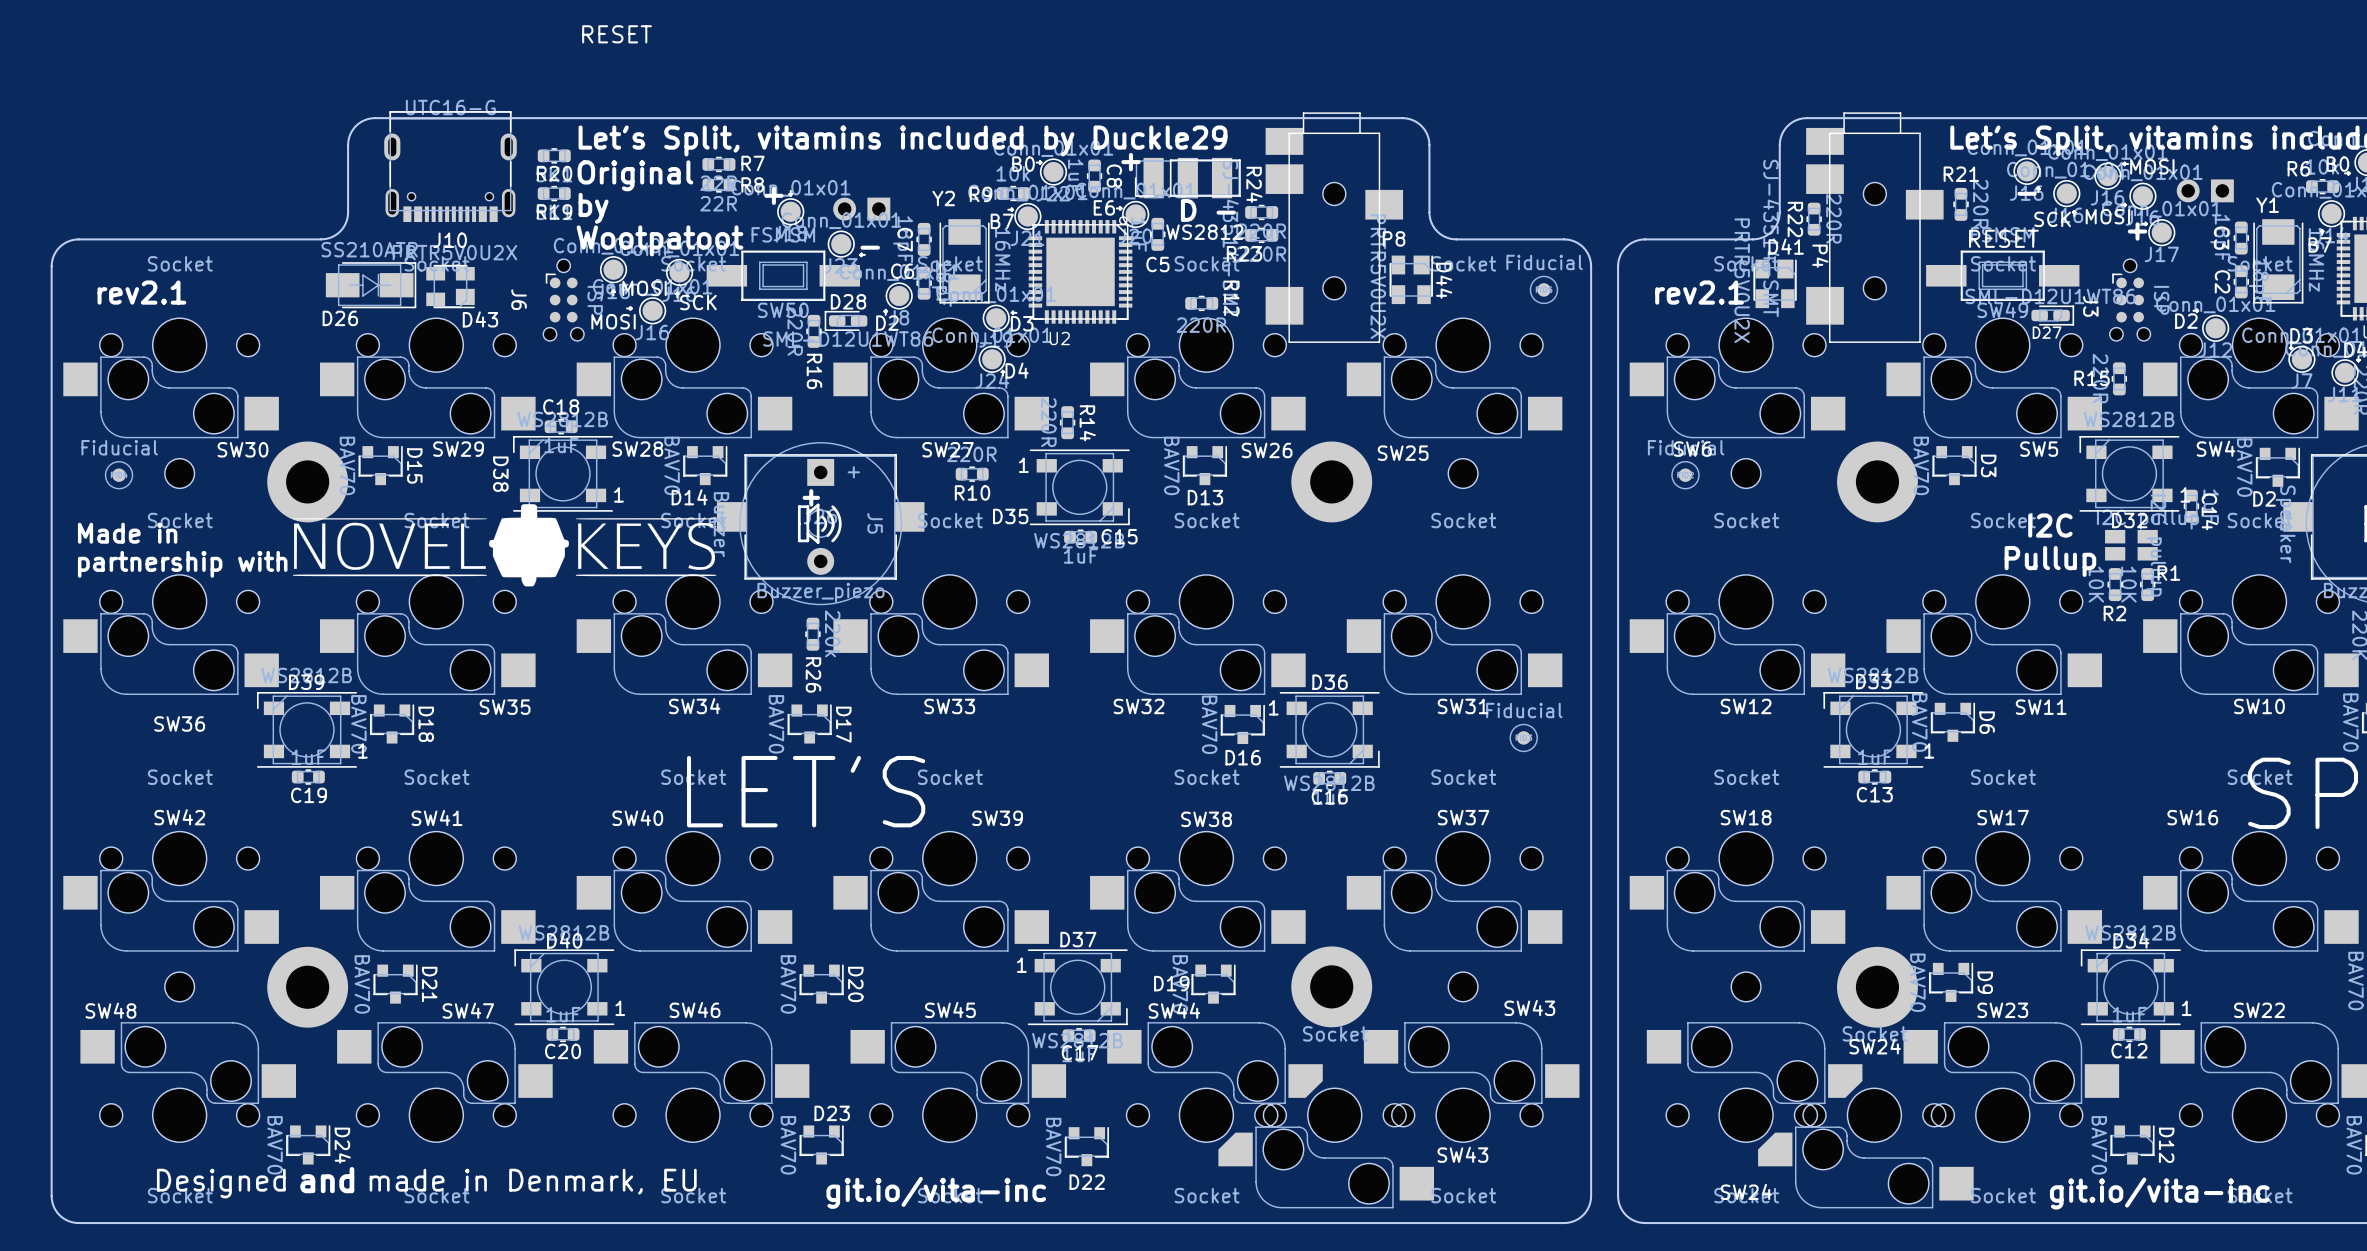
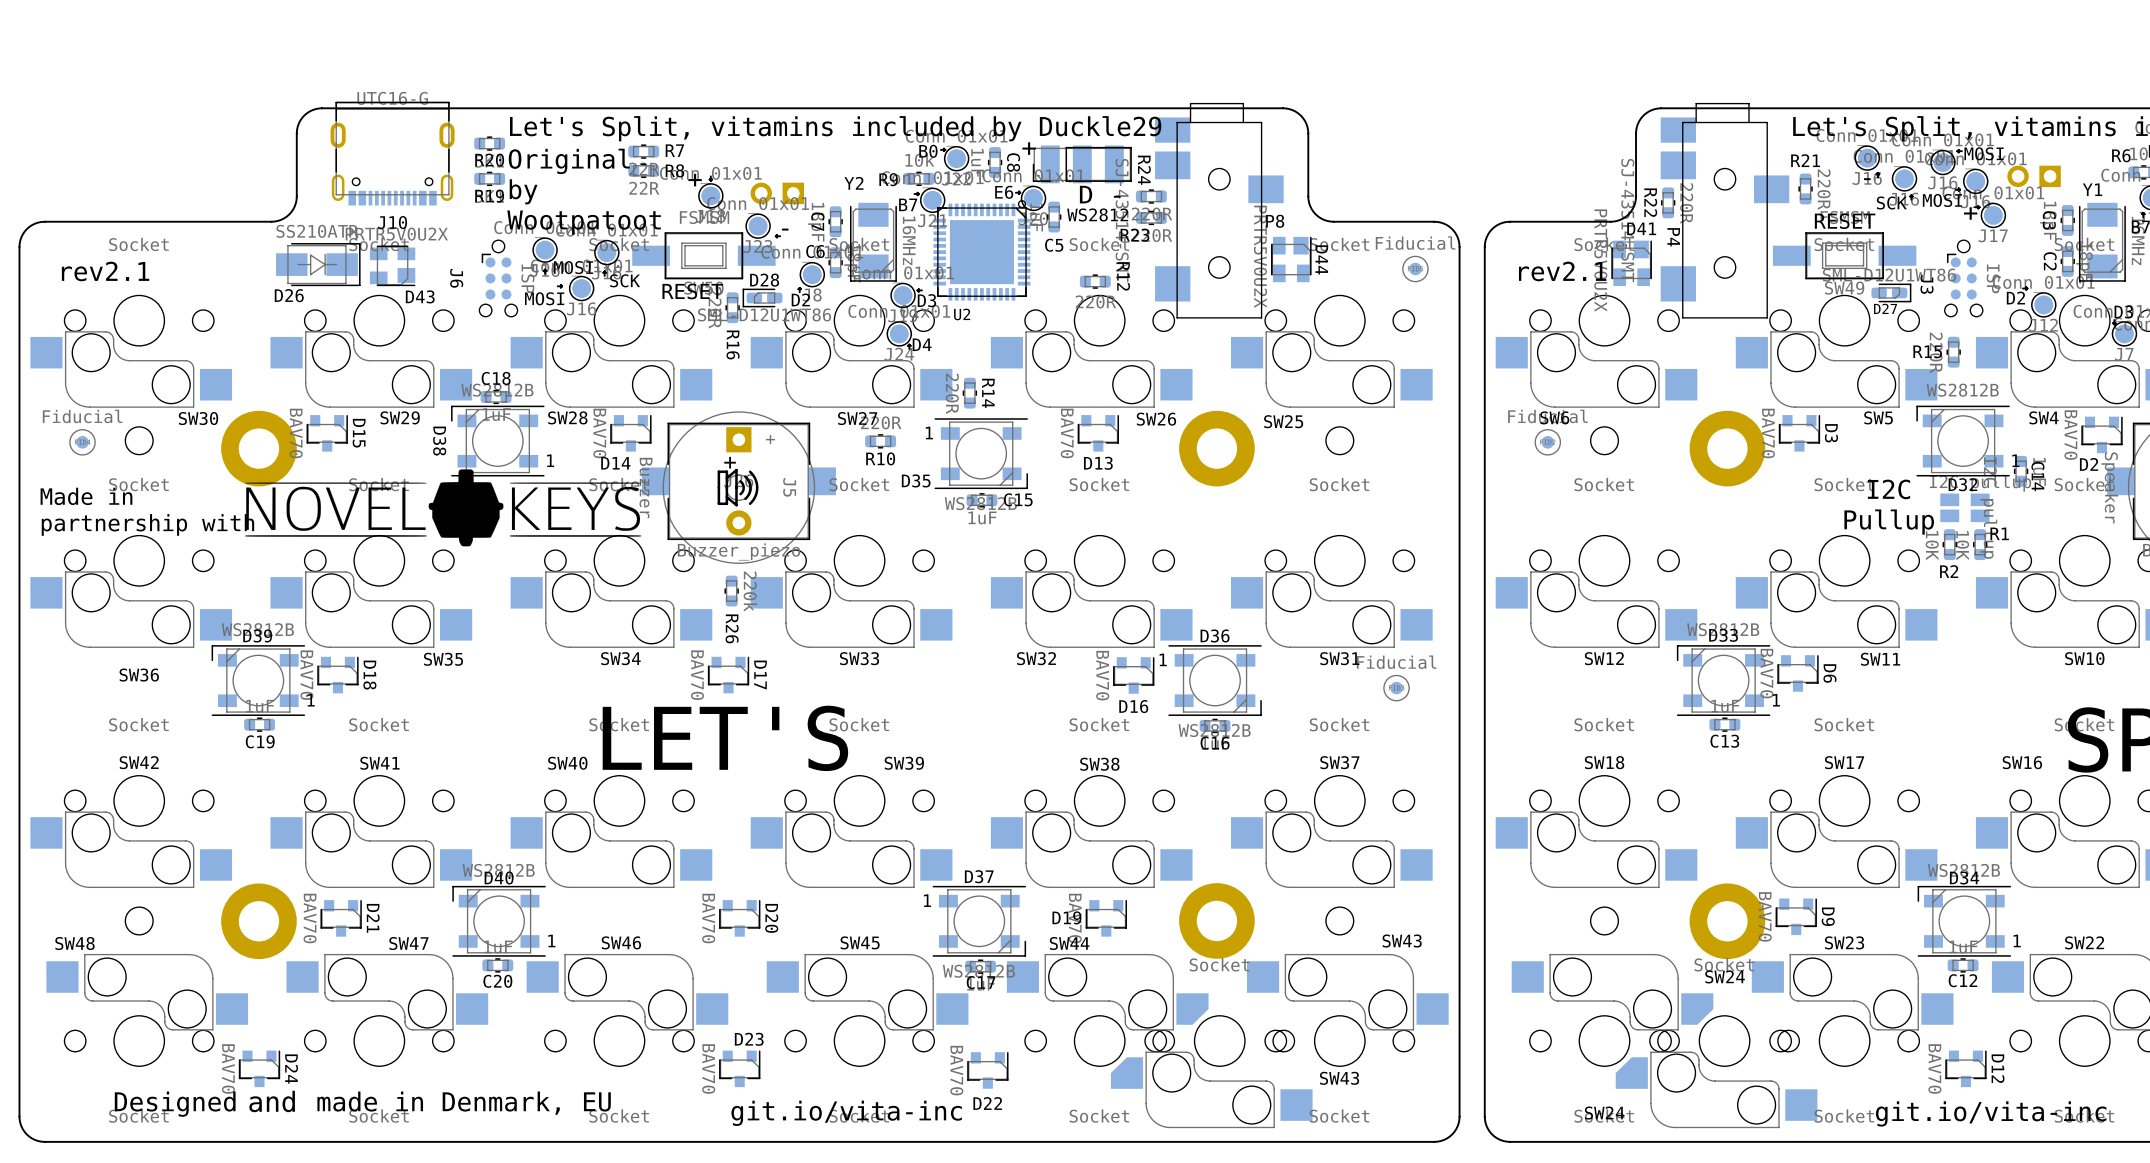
text position: RESET (617, 34) -> RESET (692, 291)

